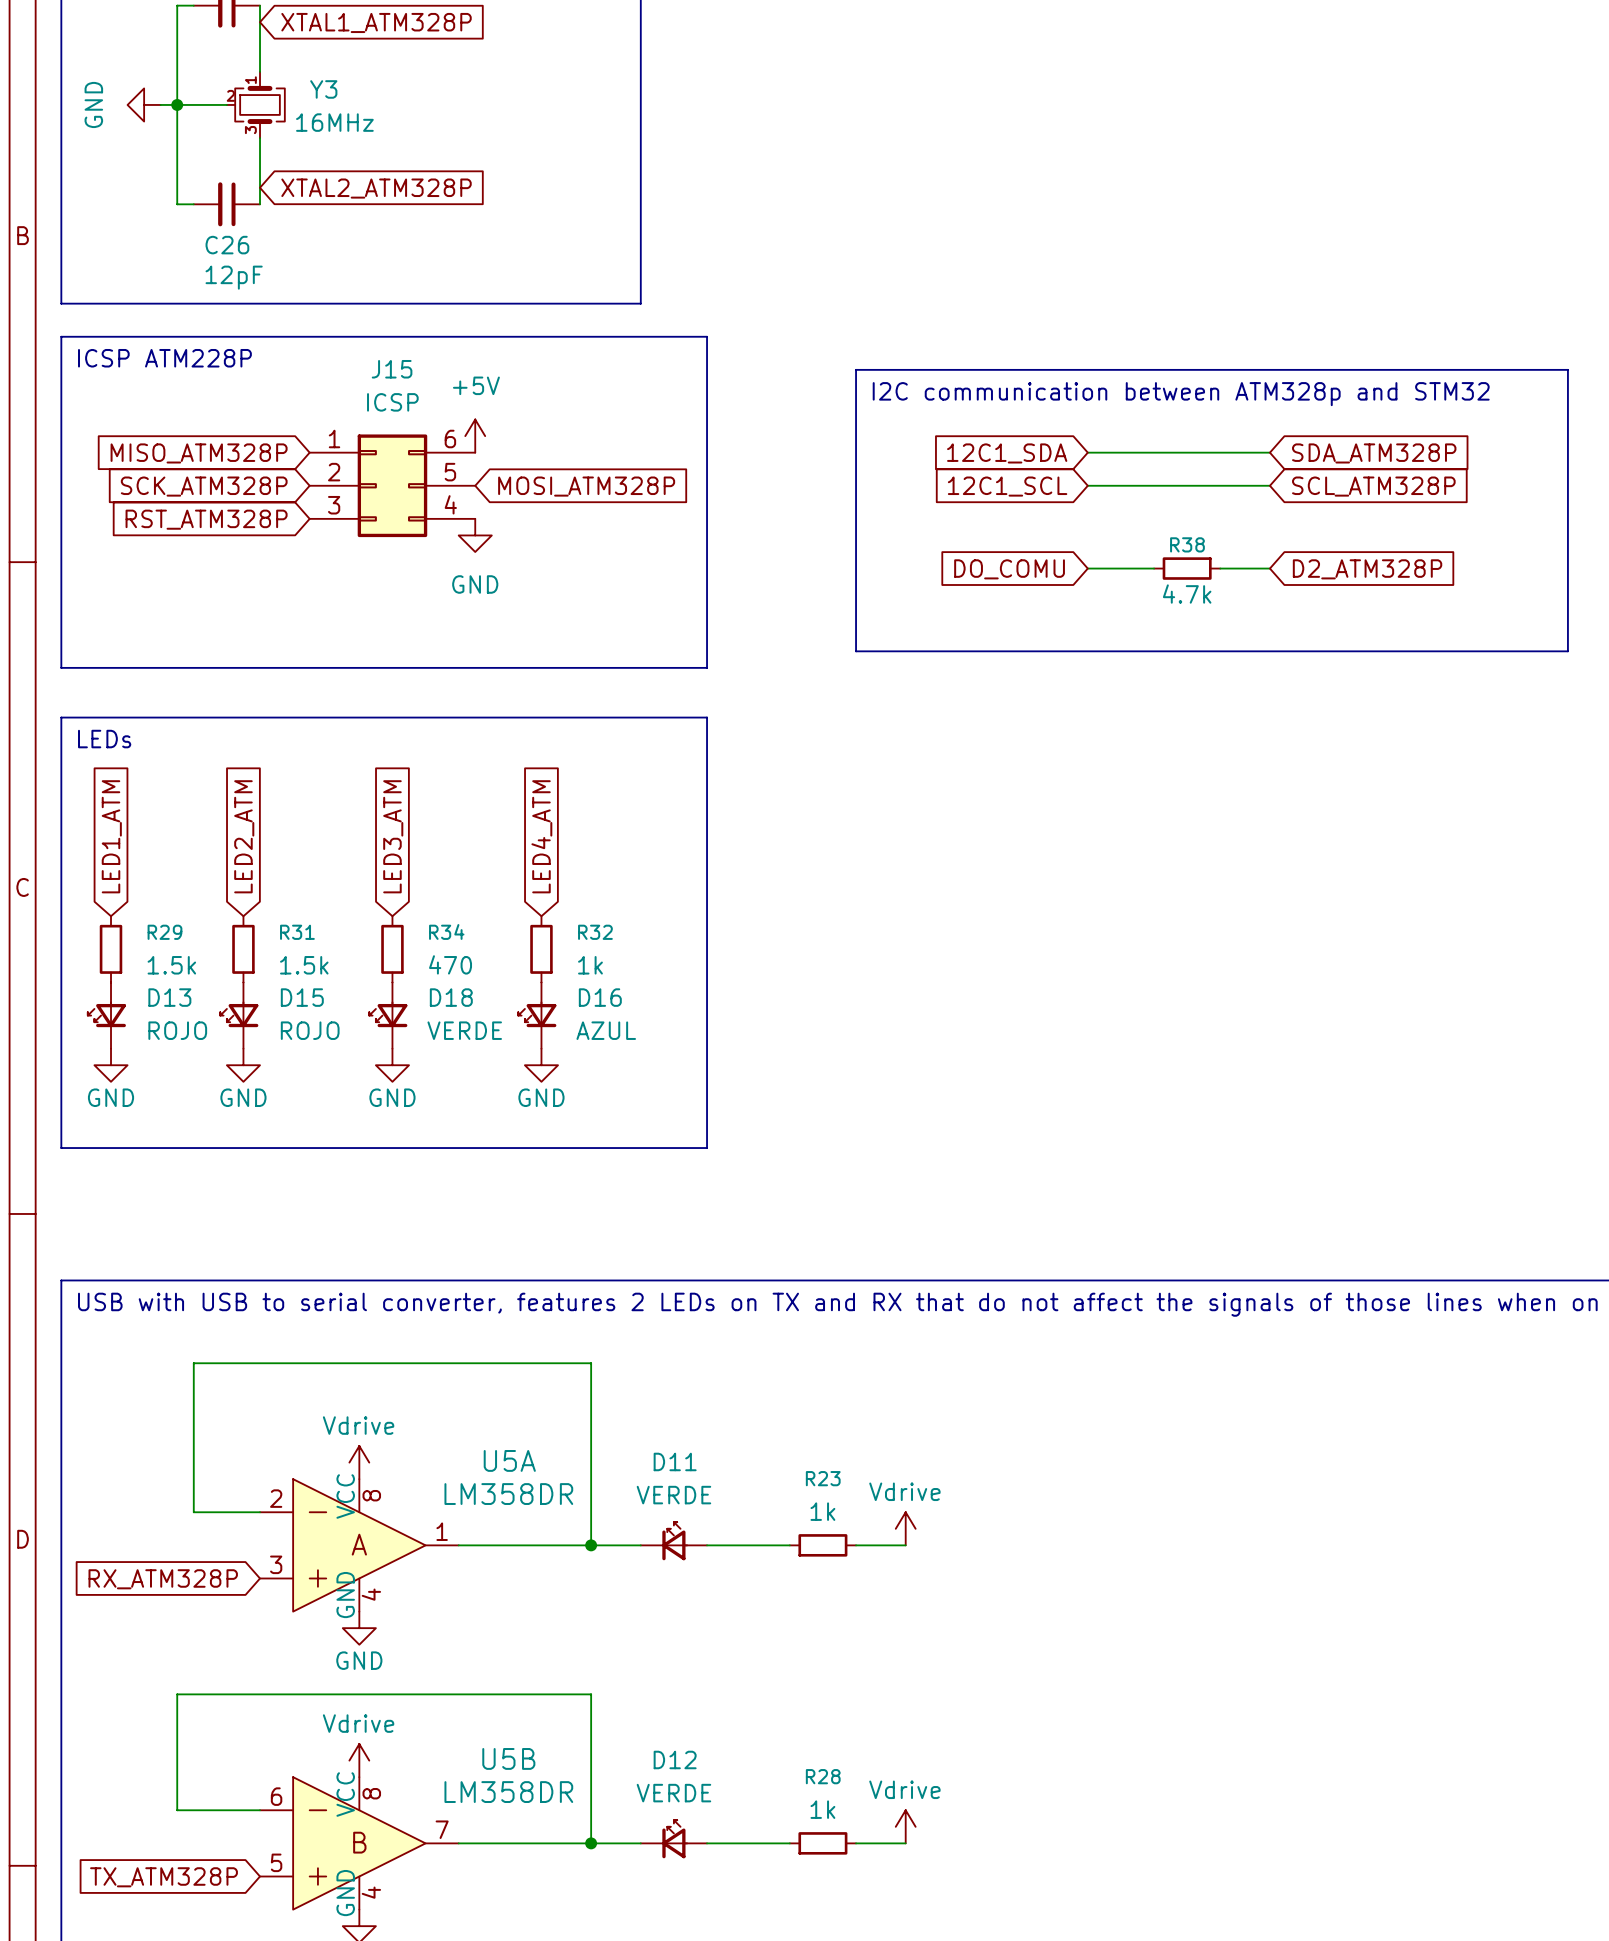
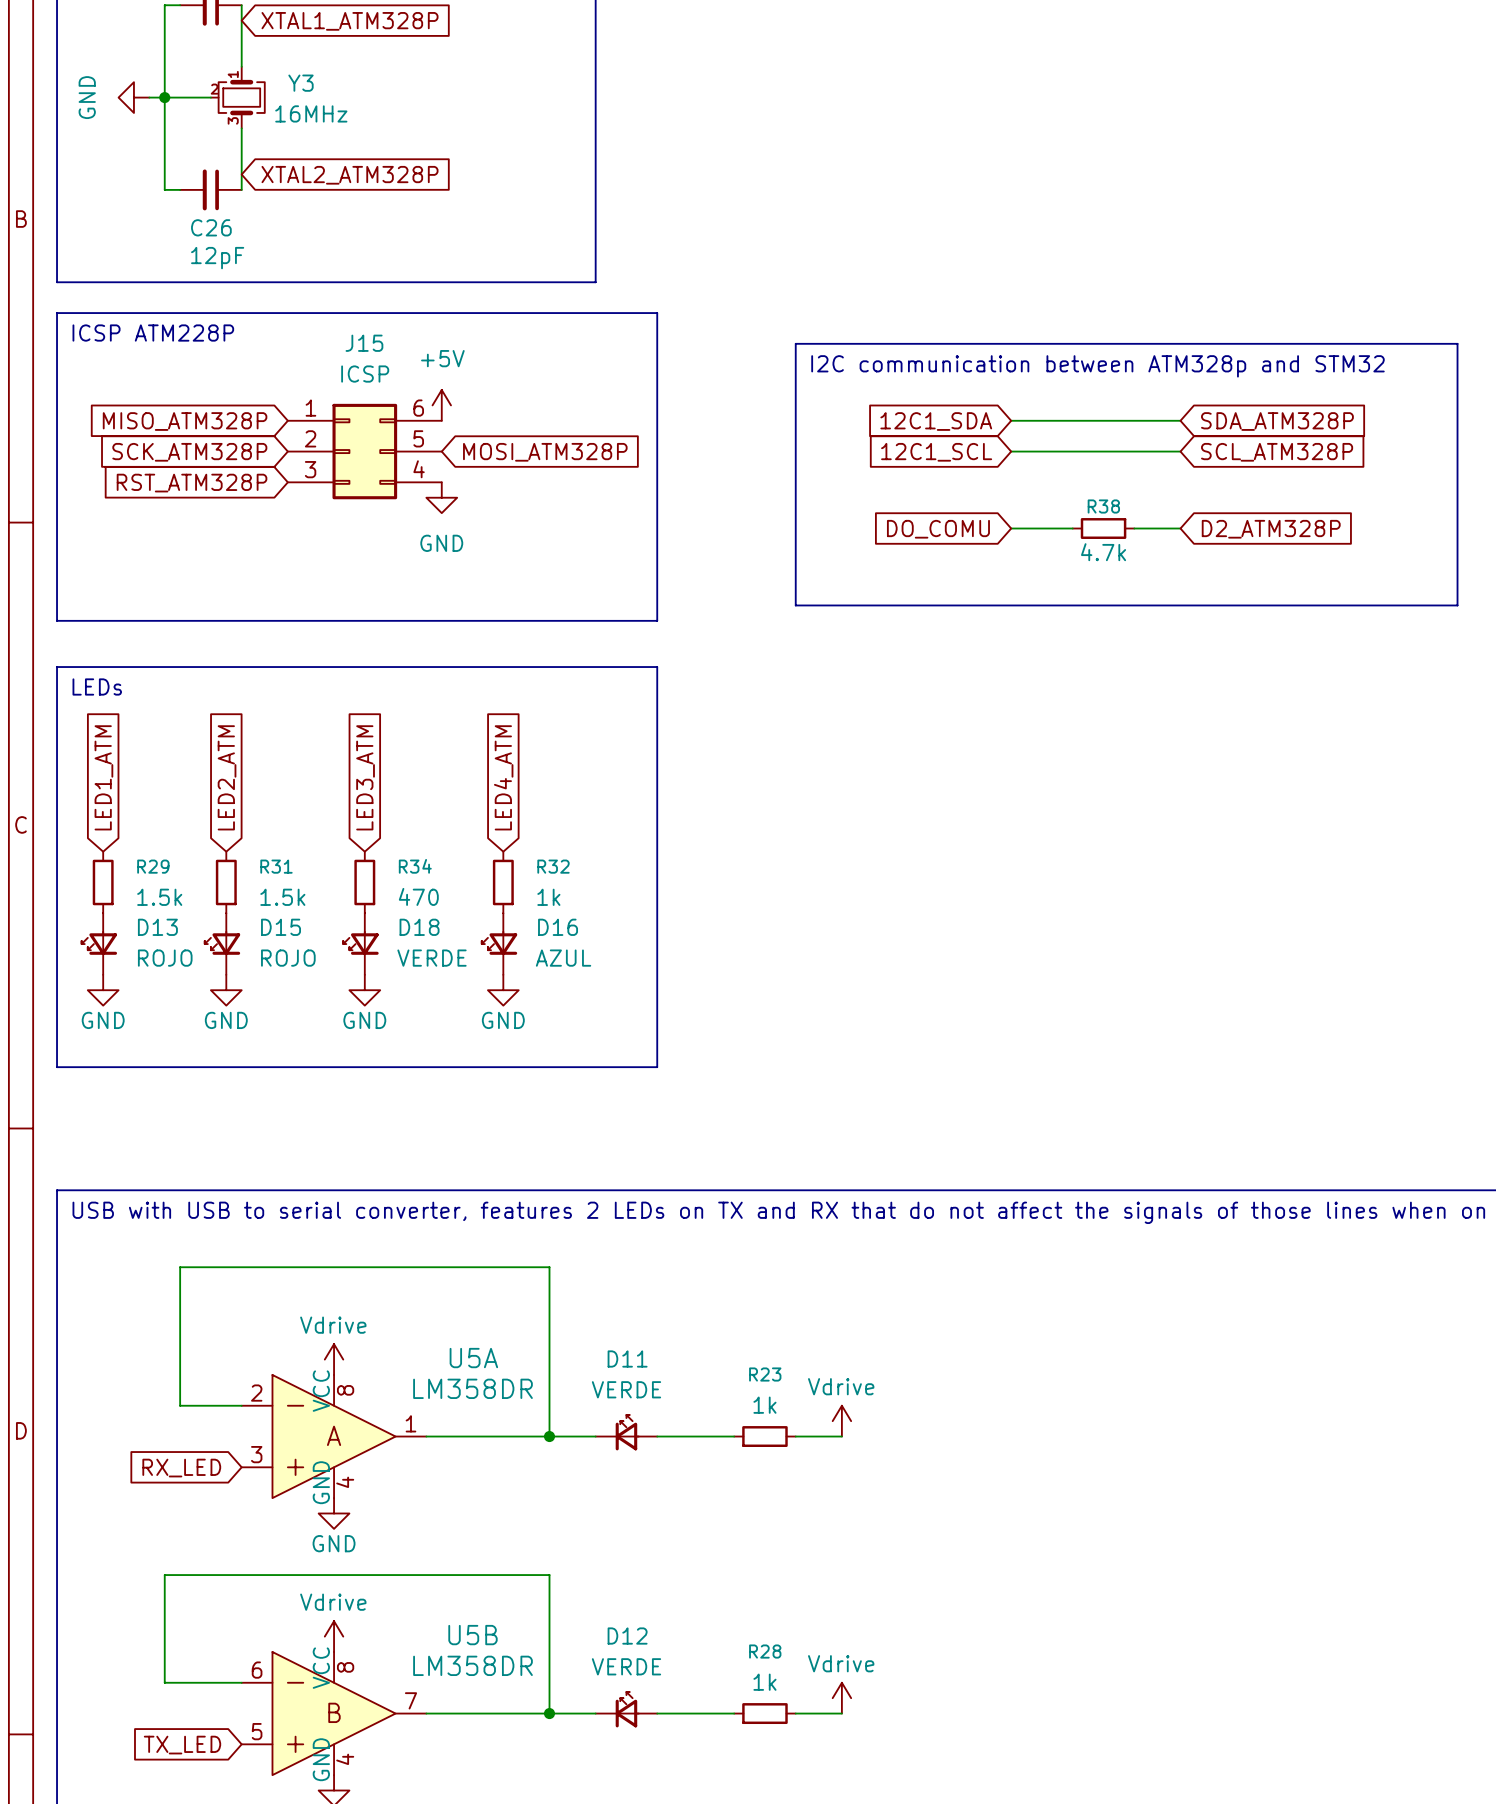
global label: RX_ATM328P (163, 1579) -> RX_LED (181, 1468)
global label: TX_ATM328P (164, 1877) -> TX_LED (182, 1745)

